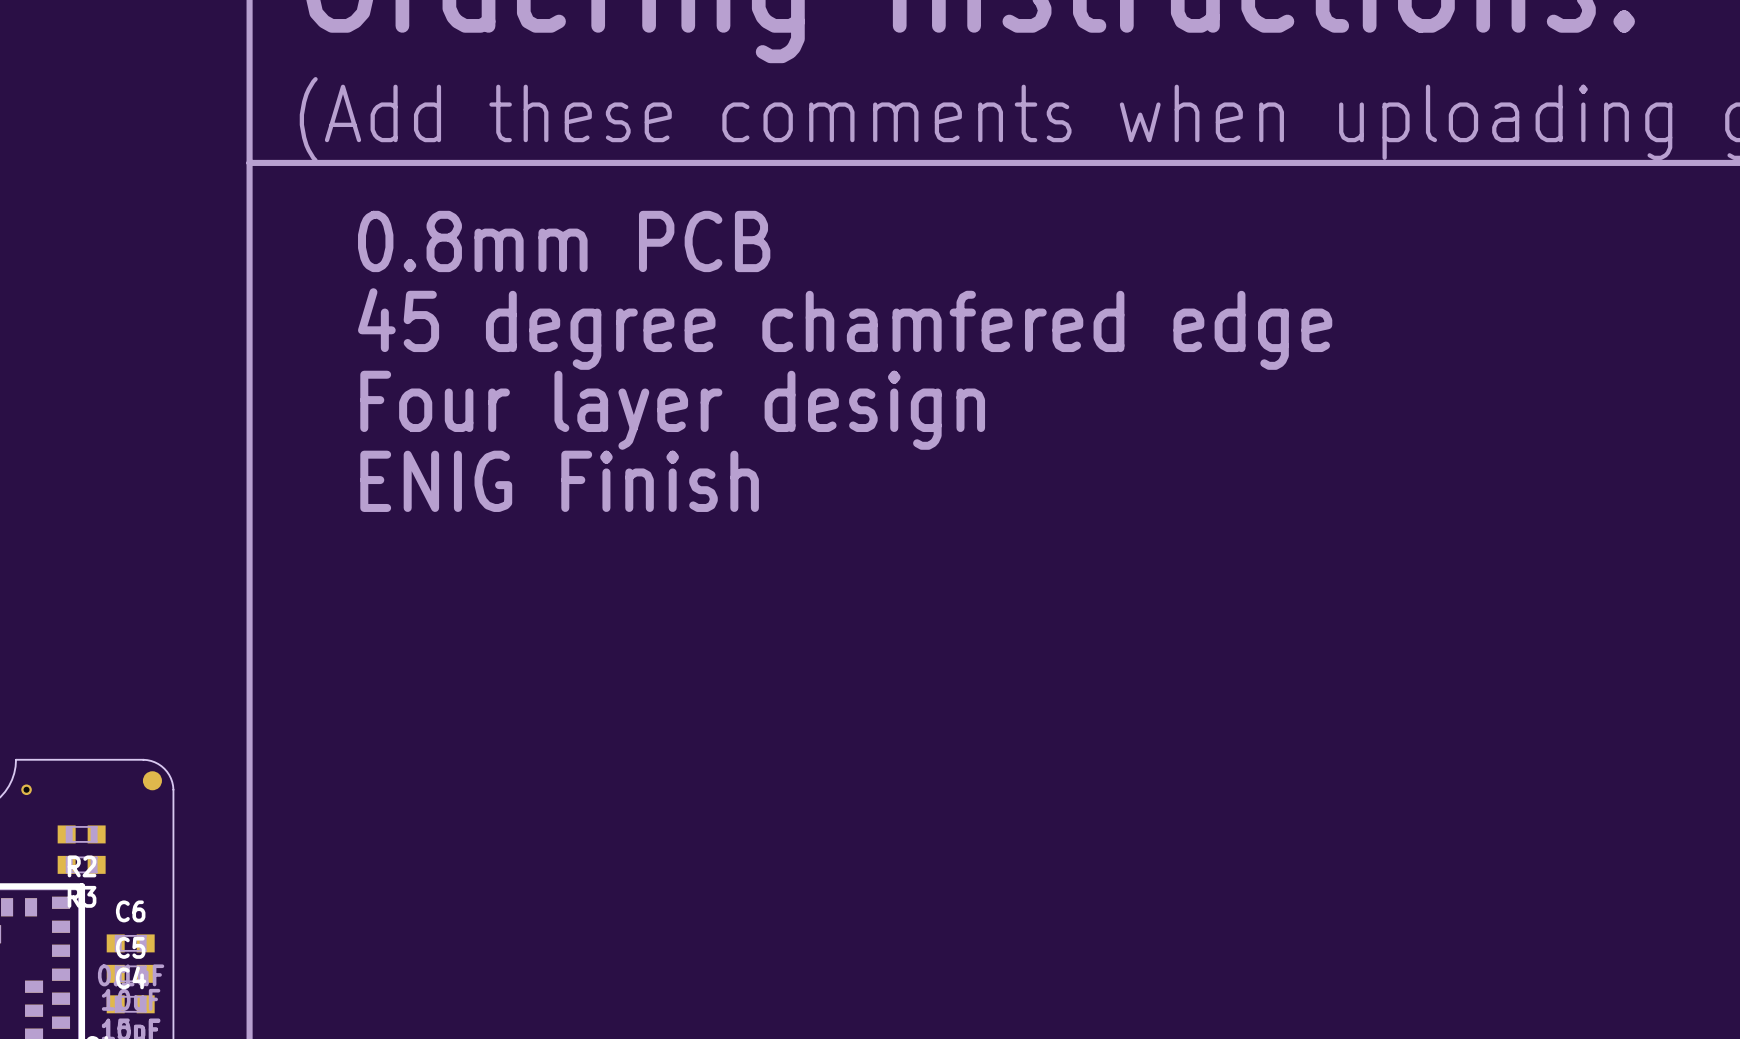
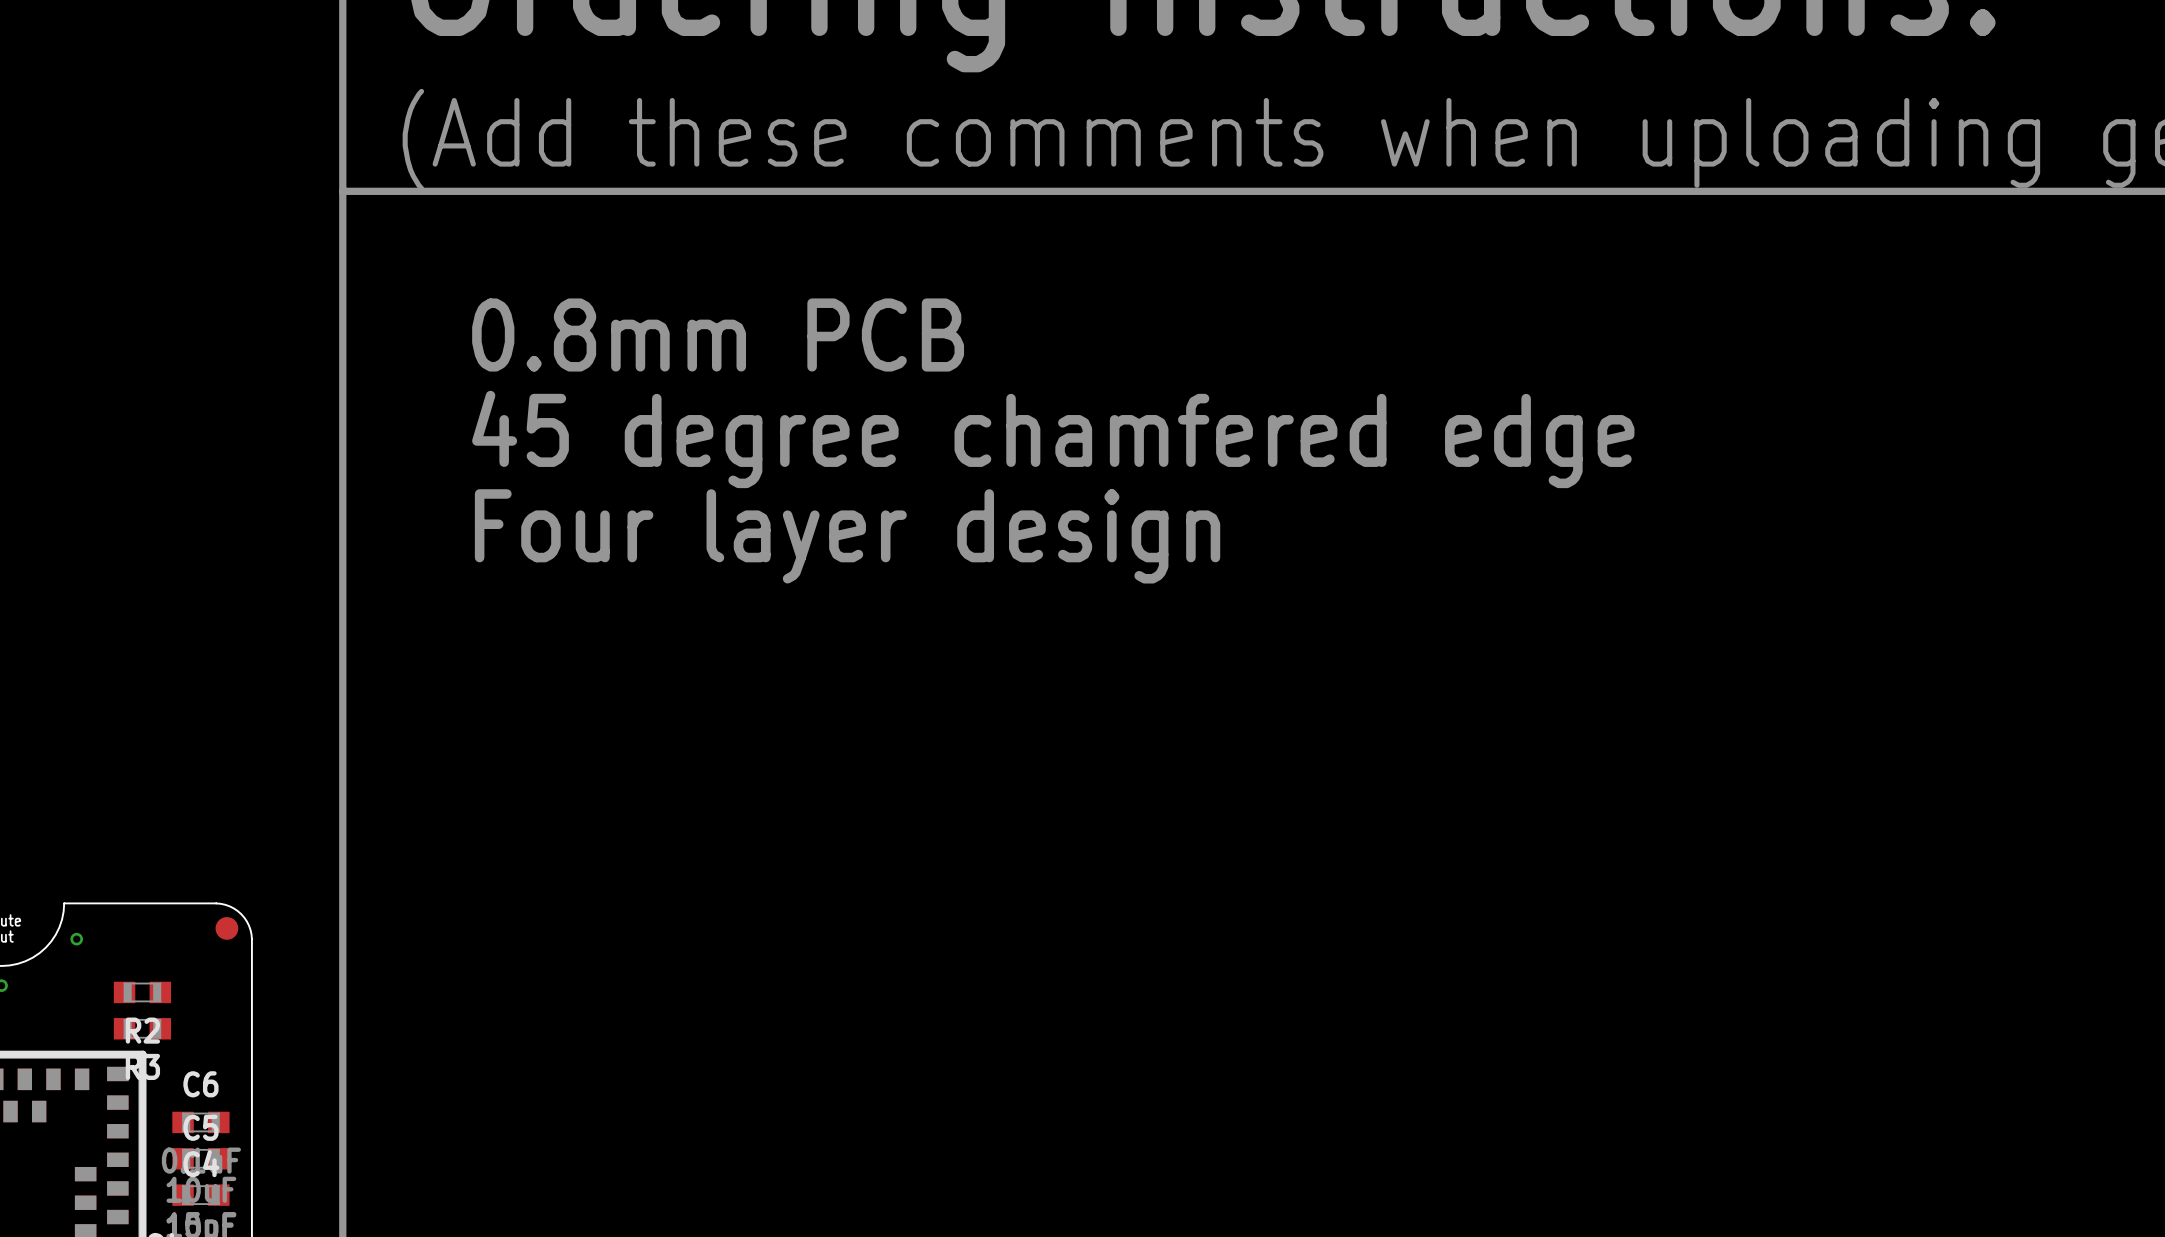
text position: 0.8mm PCB (564, 241) -> 0.8mm PCB (718, 335)
text position: 45 degree chamfered edge (845, 329) -> 45 degree chamfered edge (1053, 439)
text position: Four layer design (672, 410) -> Four layer design (847, 536)
text: ENIG Finish (559, 481) -> none

